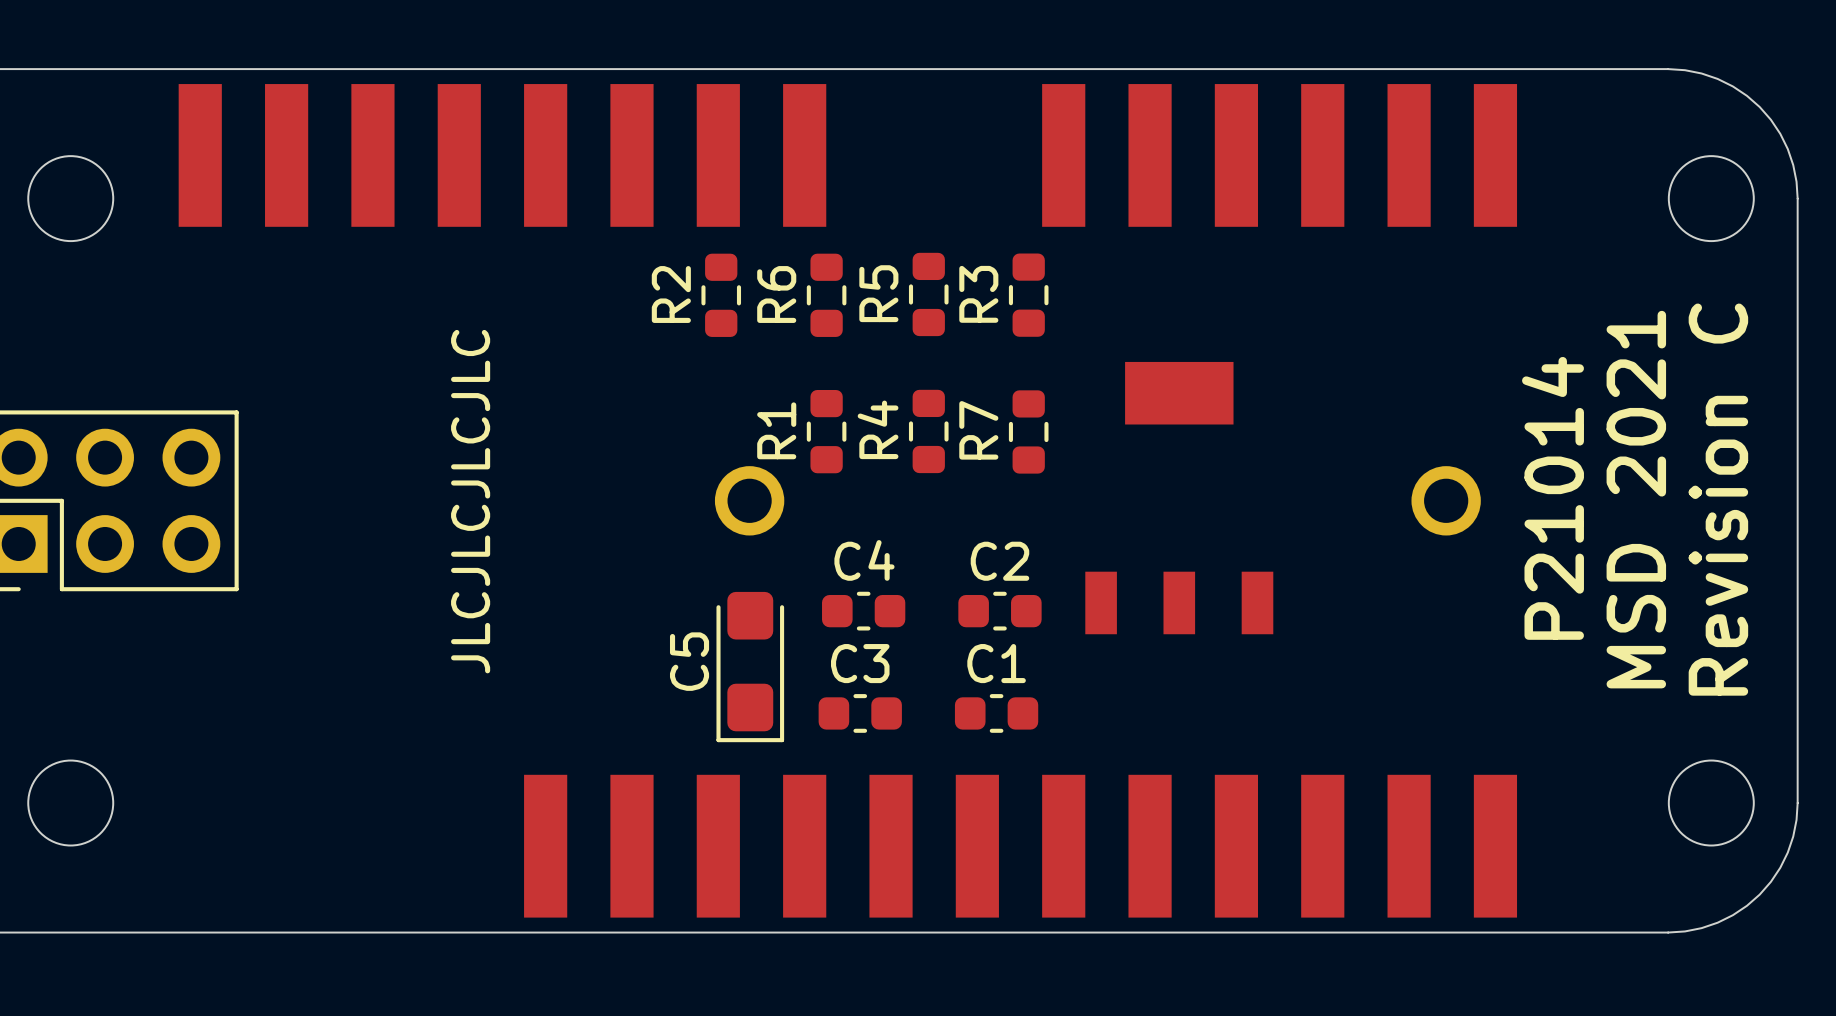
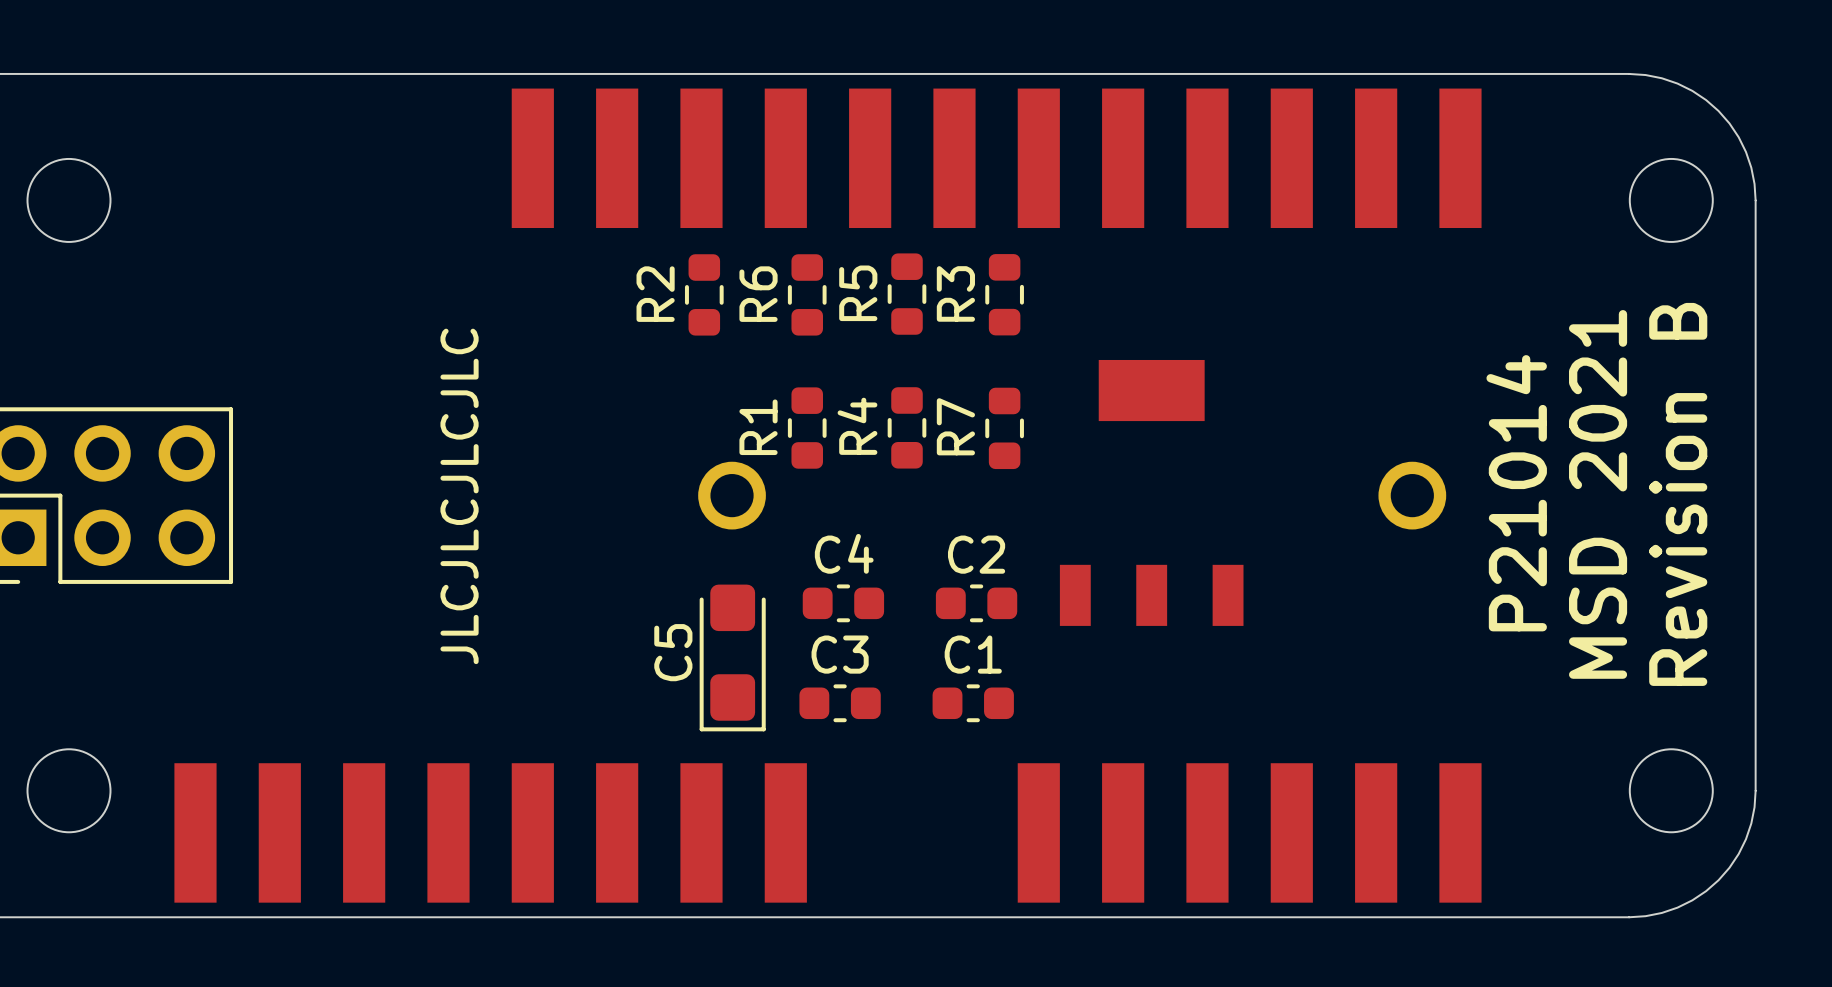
part position: (502, 155) -> (490, 832)
text: Revision C (1718, 499) -> Revision B (1678, 494)
part position: (1020, 846) -> (996, 158)

